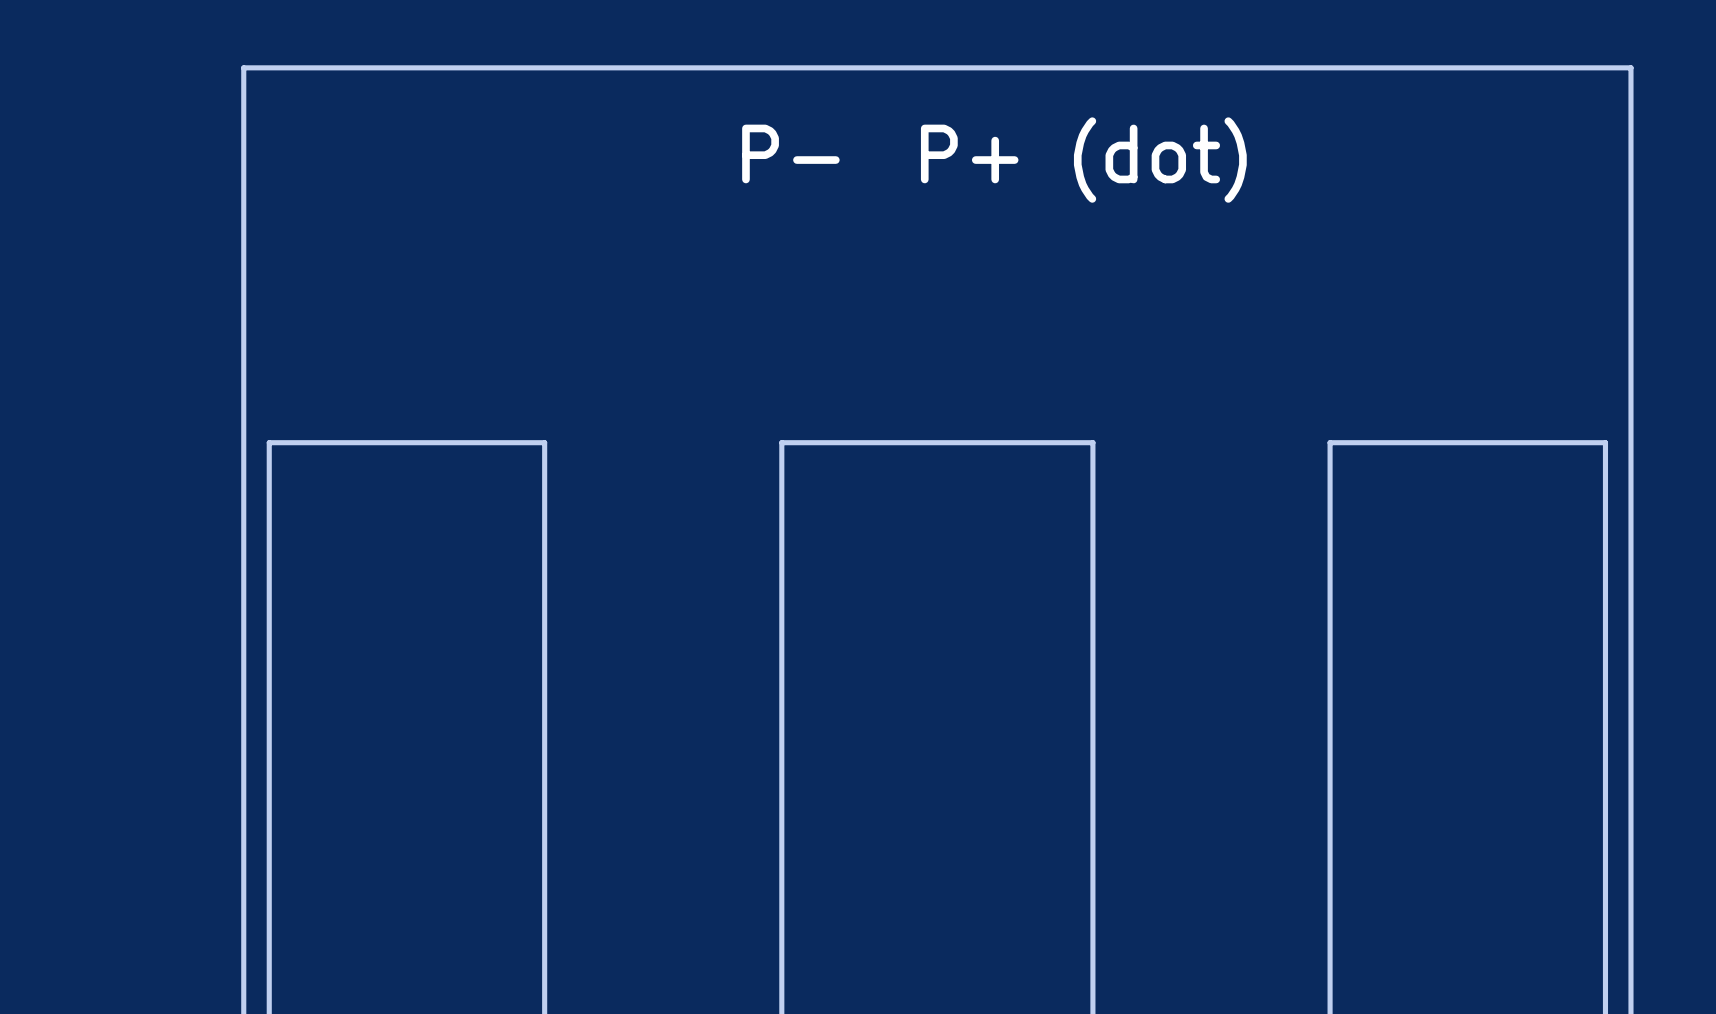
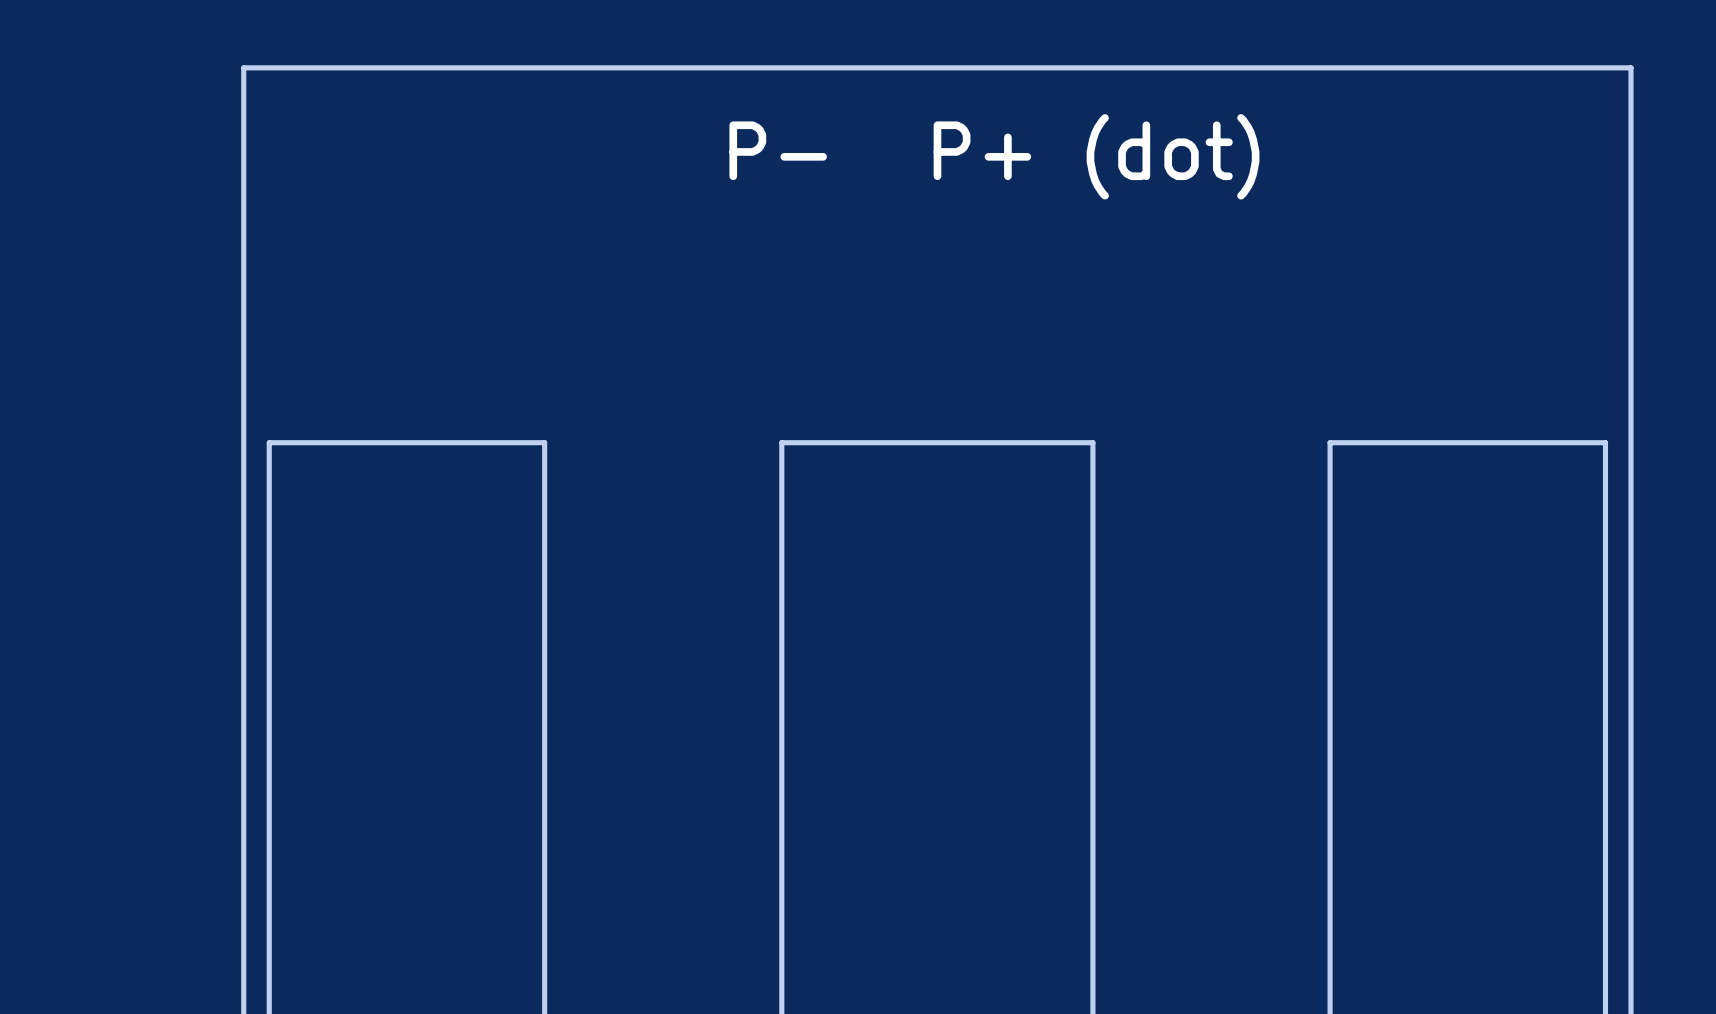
text position: P− (790, 153) -> P− (778, 150)
text position: P+ (dot) (1083, 160) -> P+ (dot) (1096, 156)

